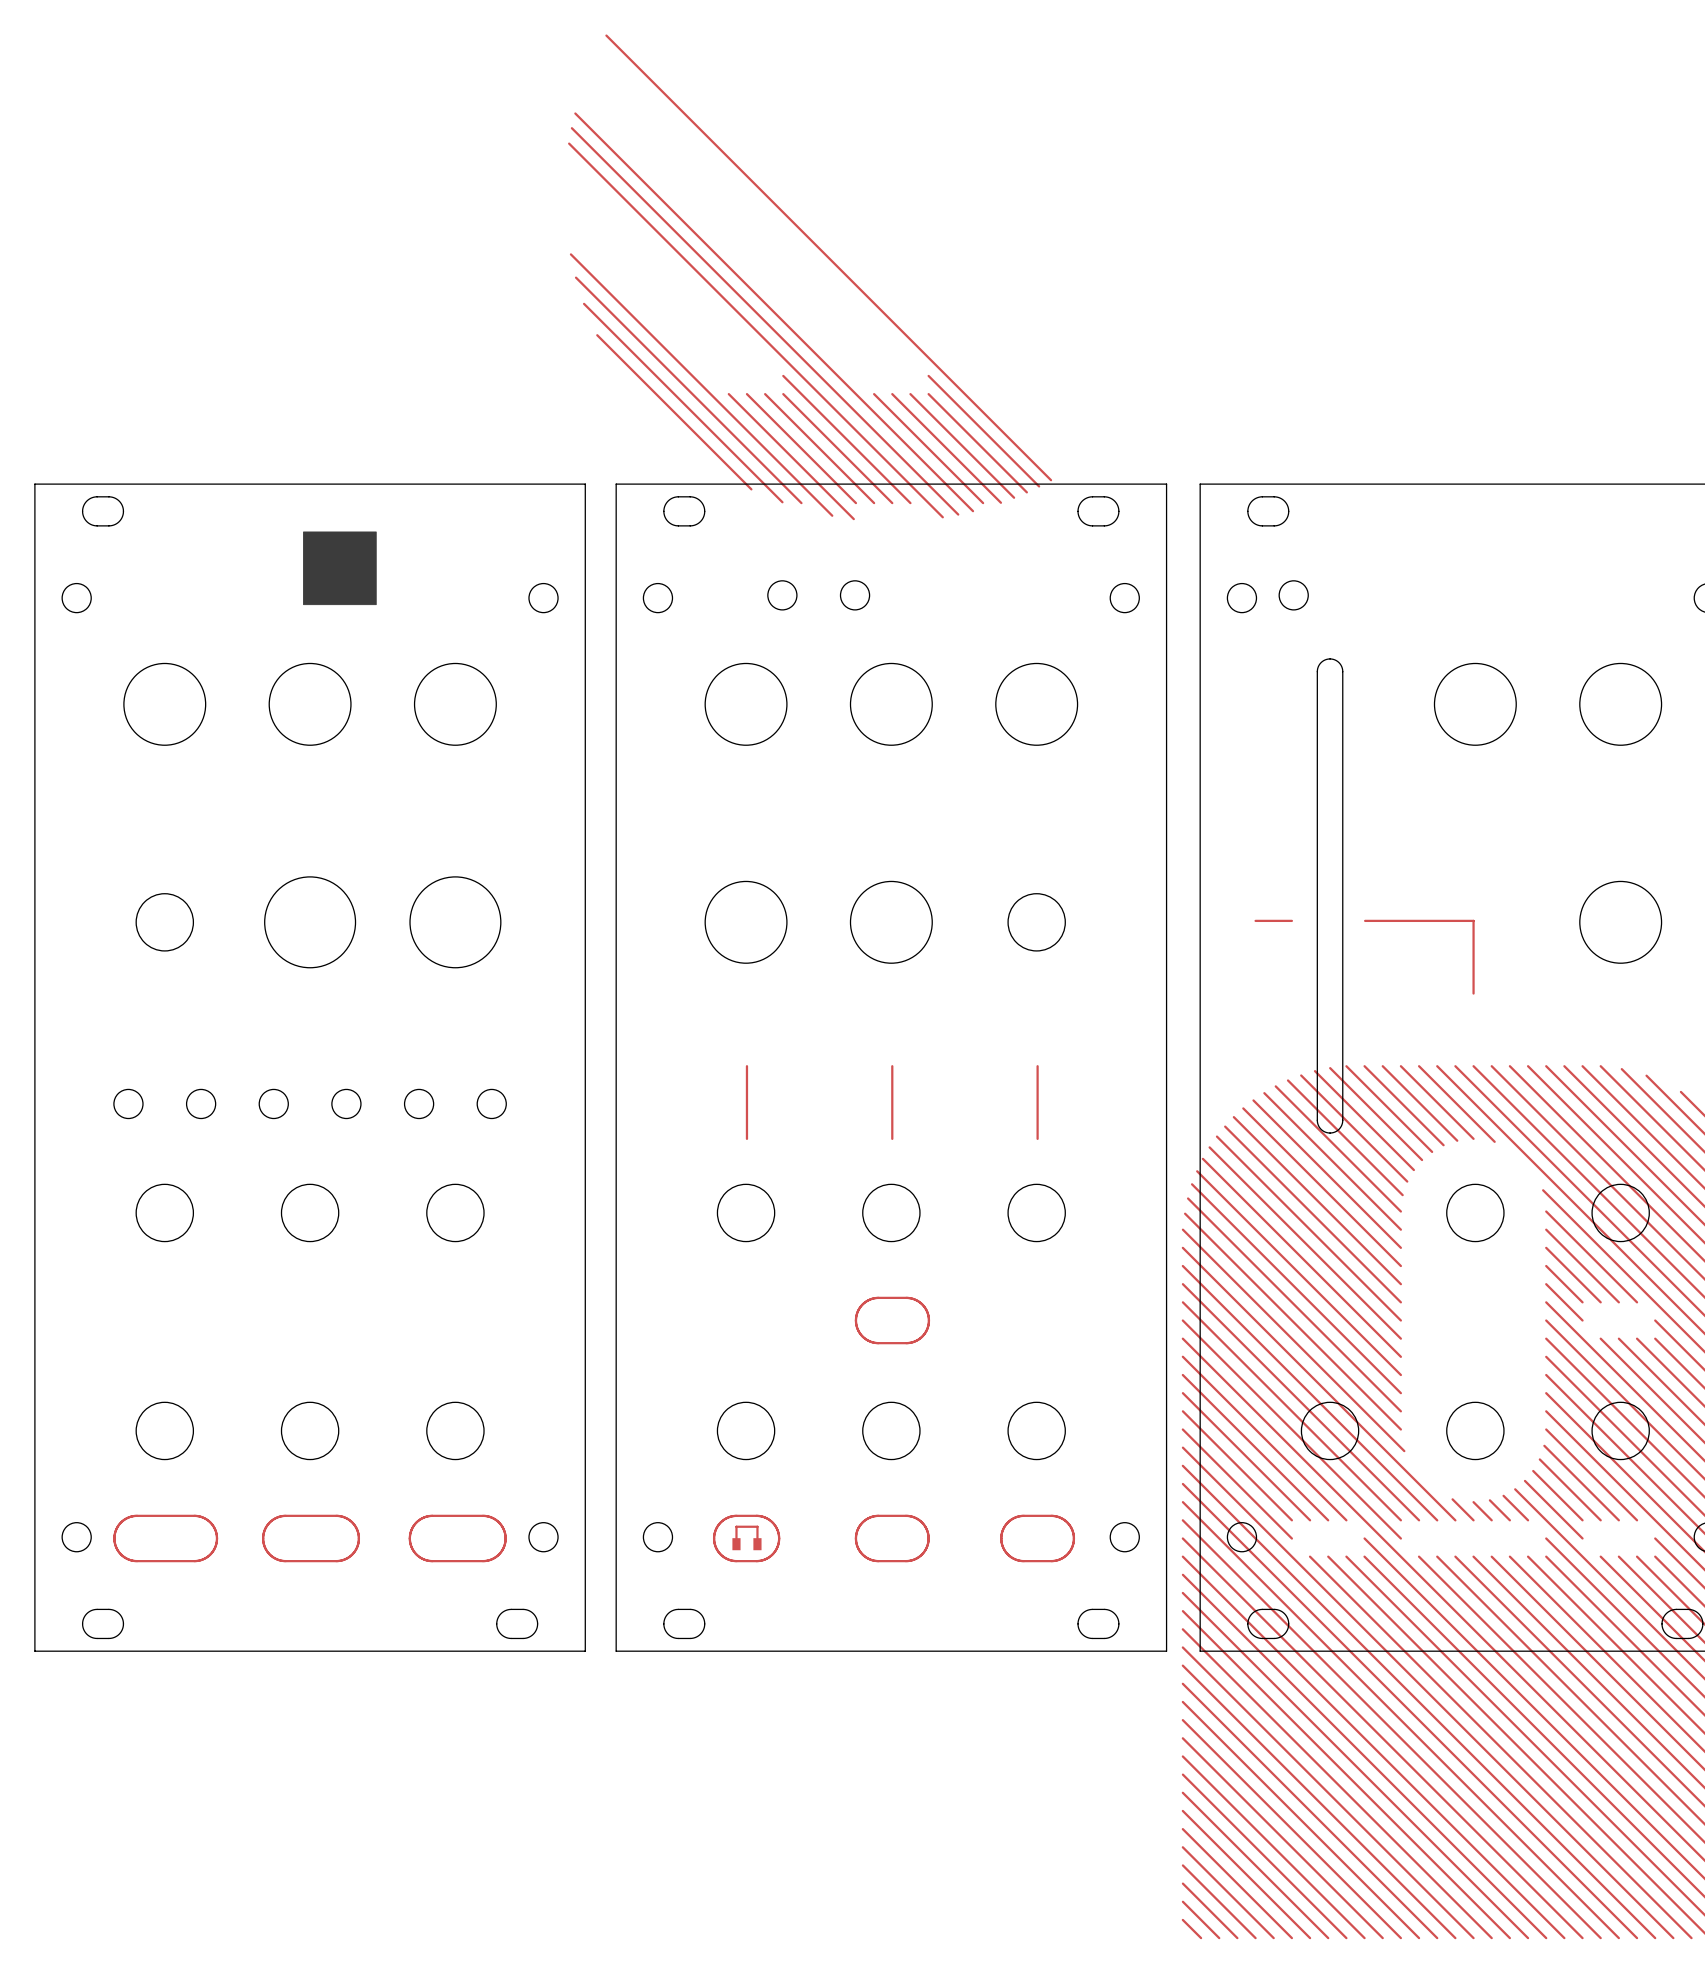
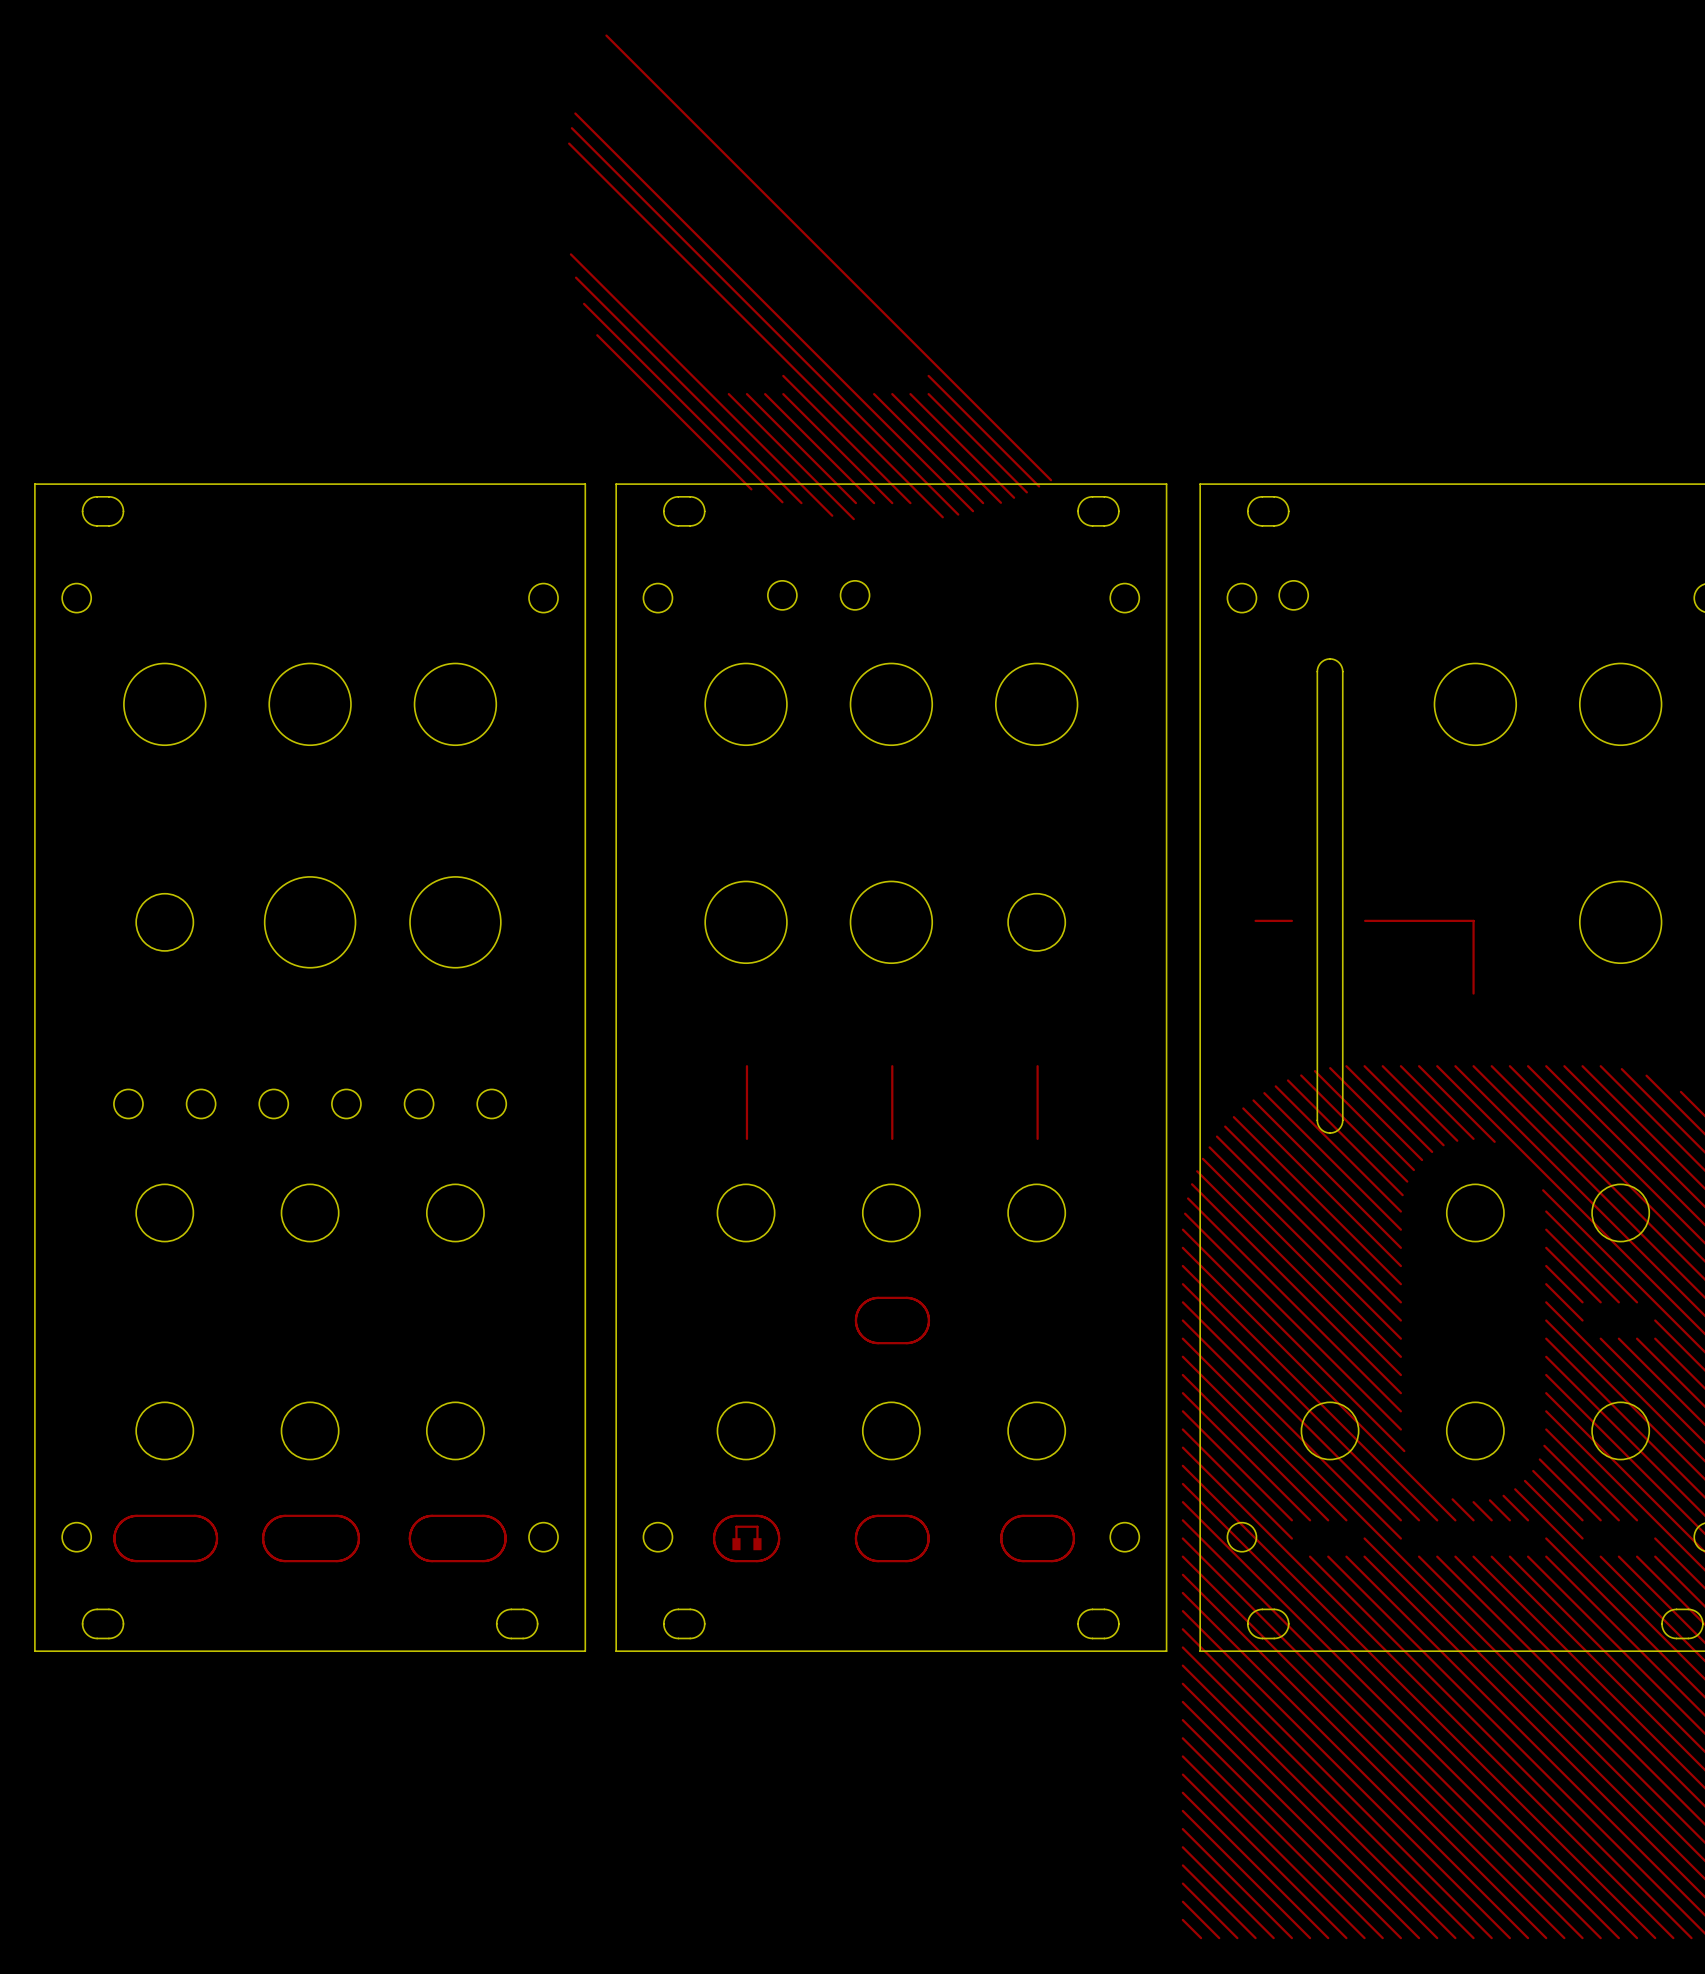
drawing: [303, 531, 377, 606] -> none

